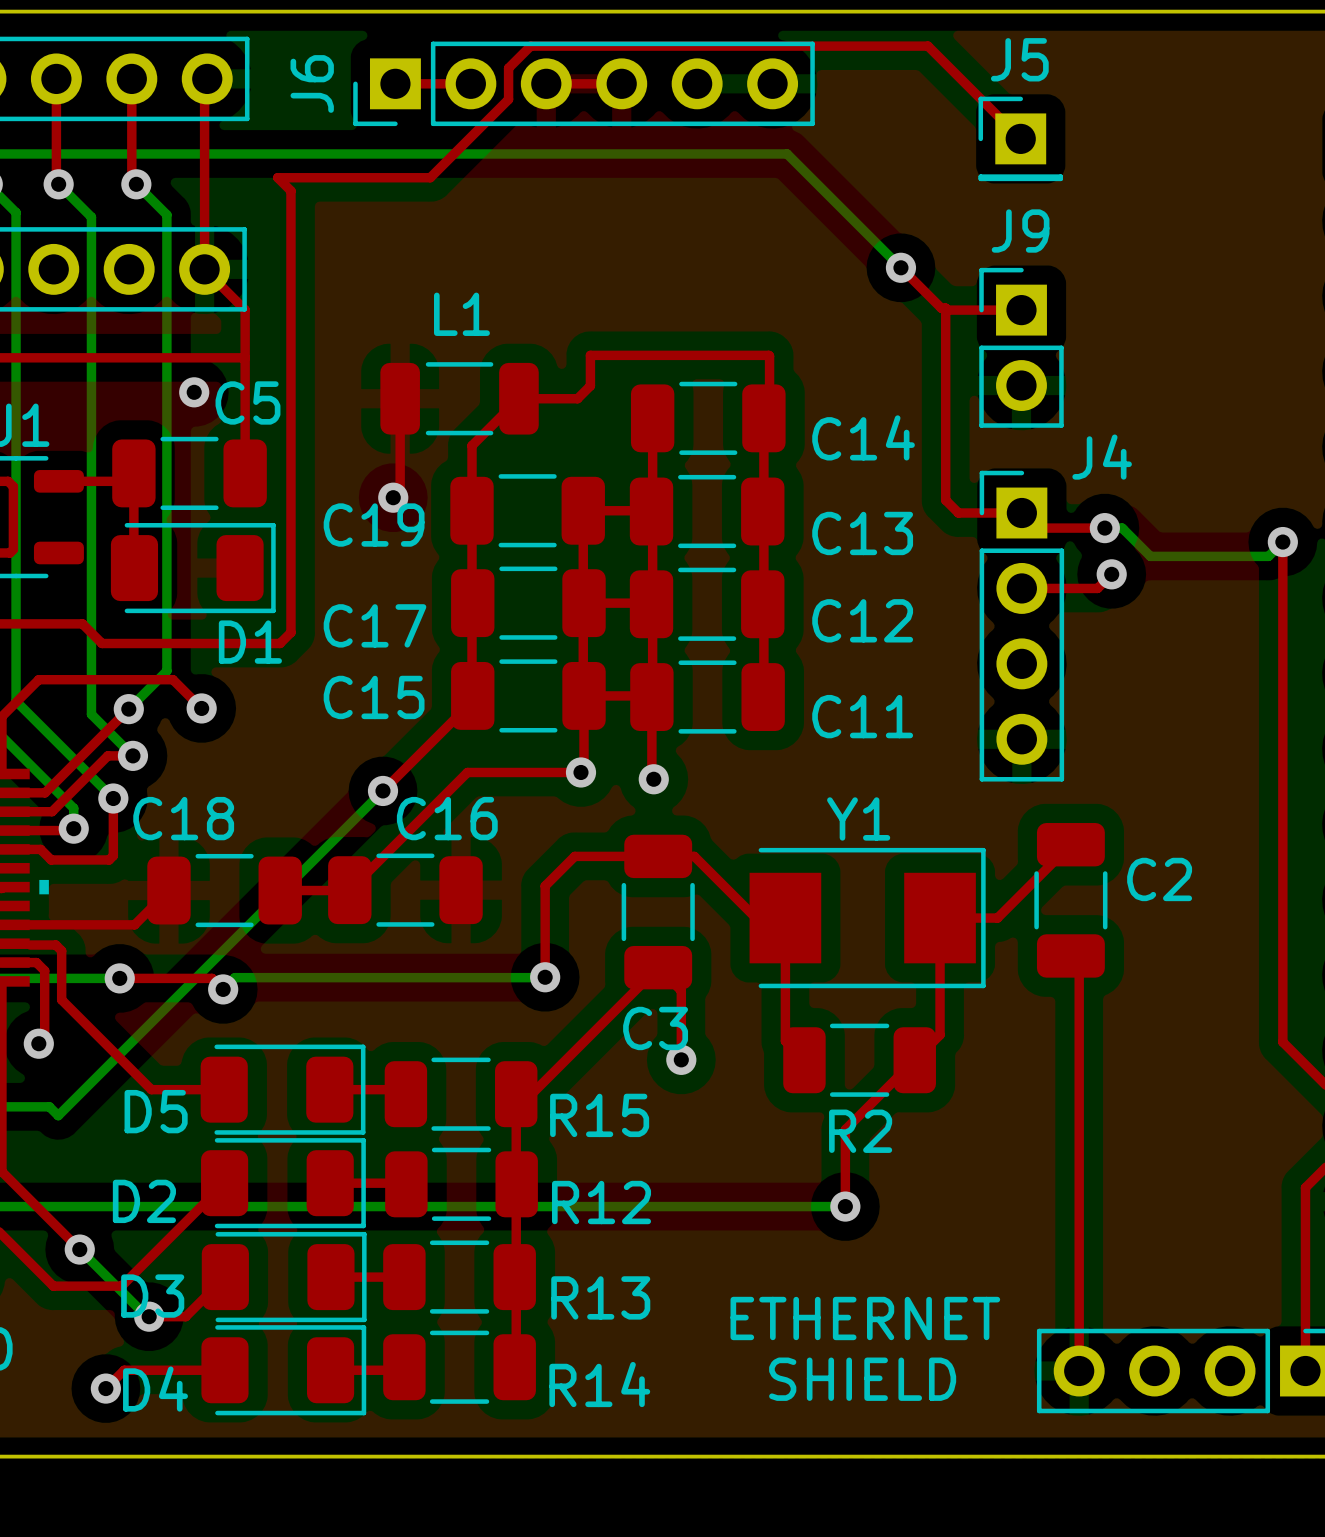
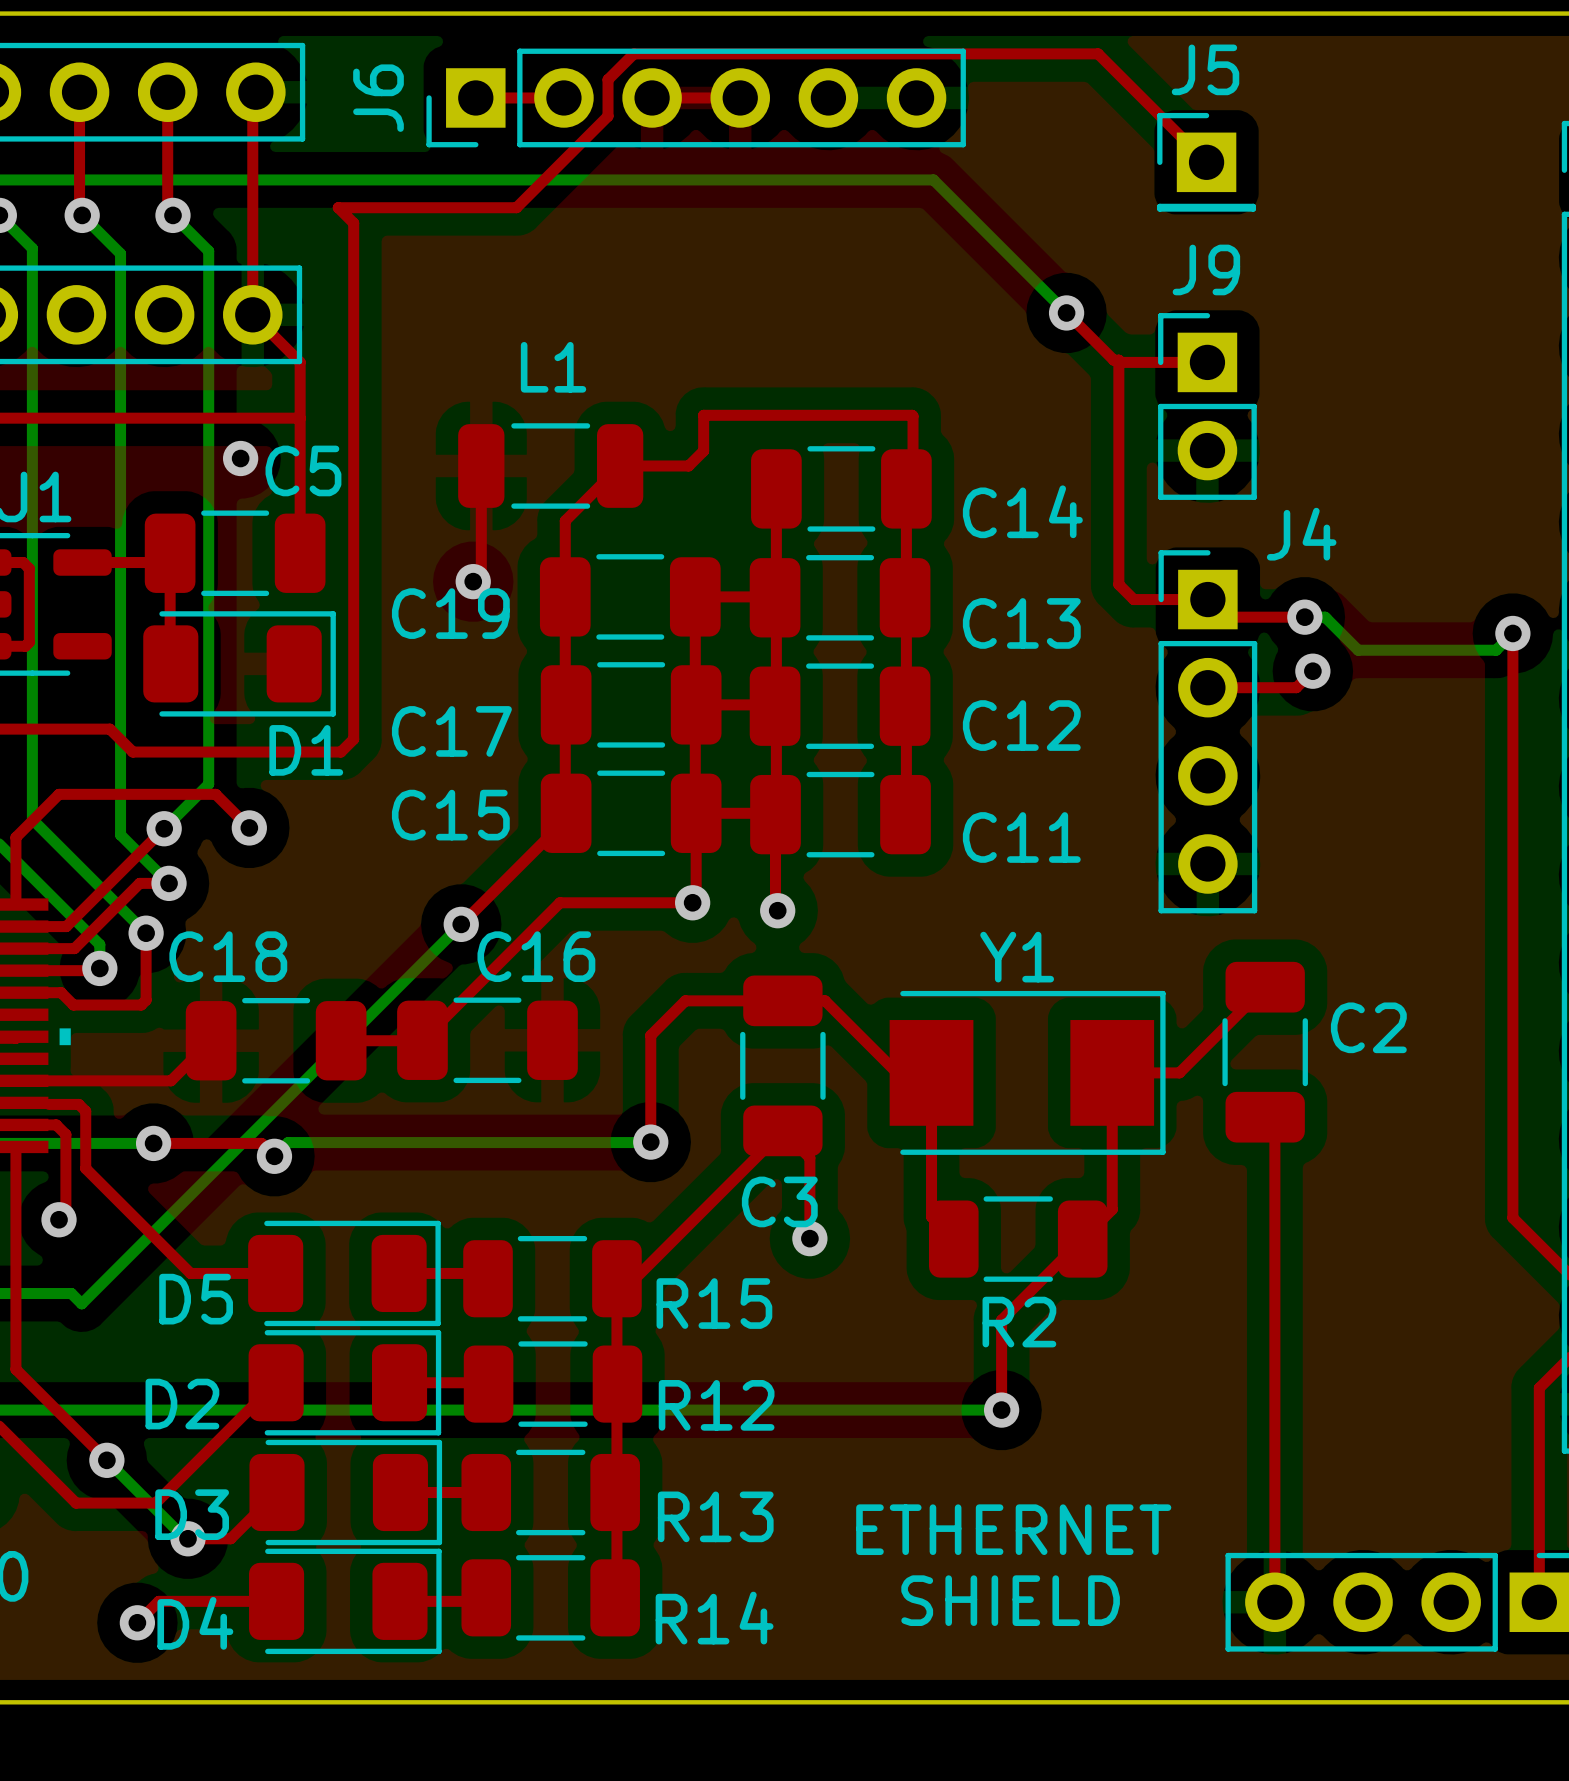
text position: ETHERNET (865, 1318) -> ETHERNET (1013, 1529)
text position: SHIELD (862, 1379) -> SHIELD (1010, 1600)

